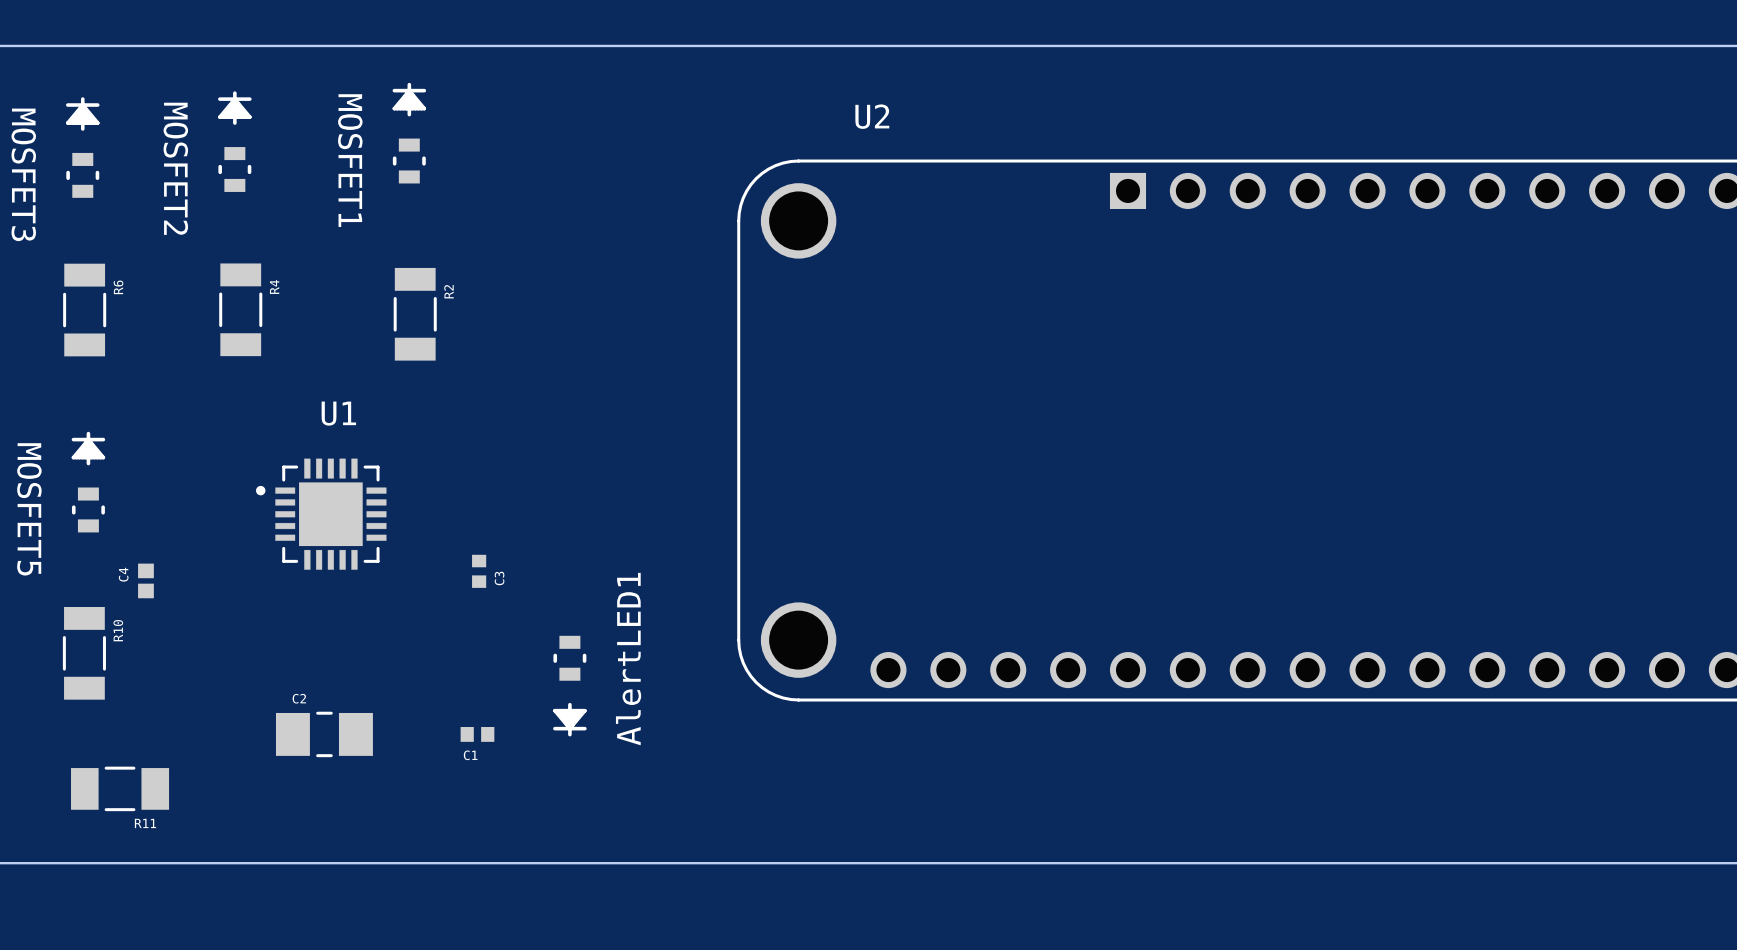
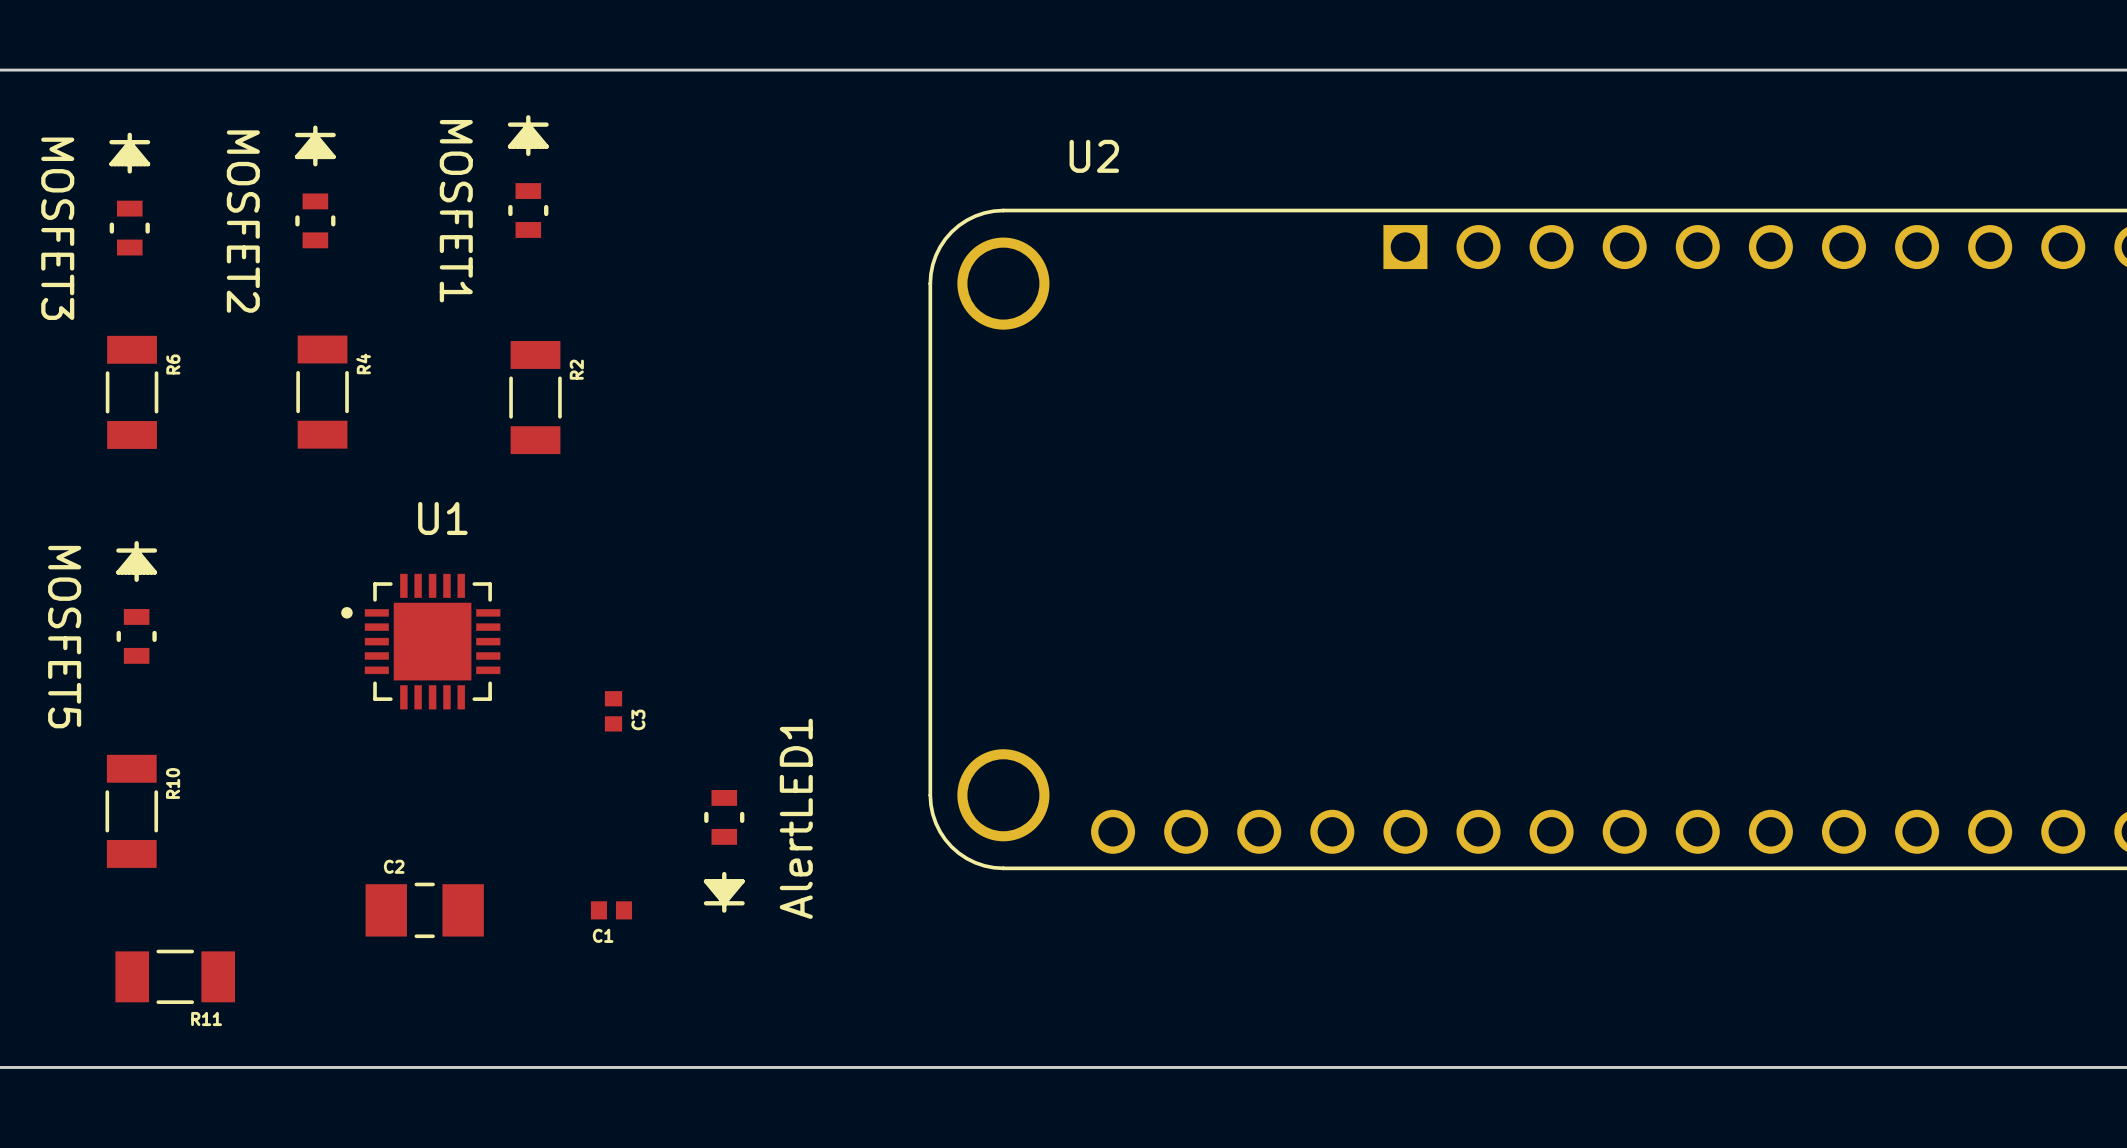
C4: (145, 580) -> none

